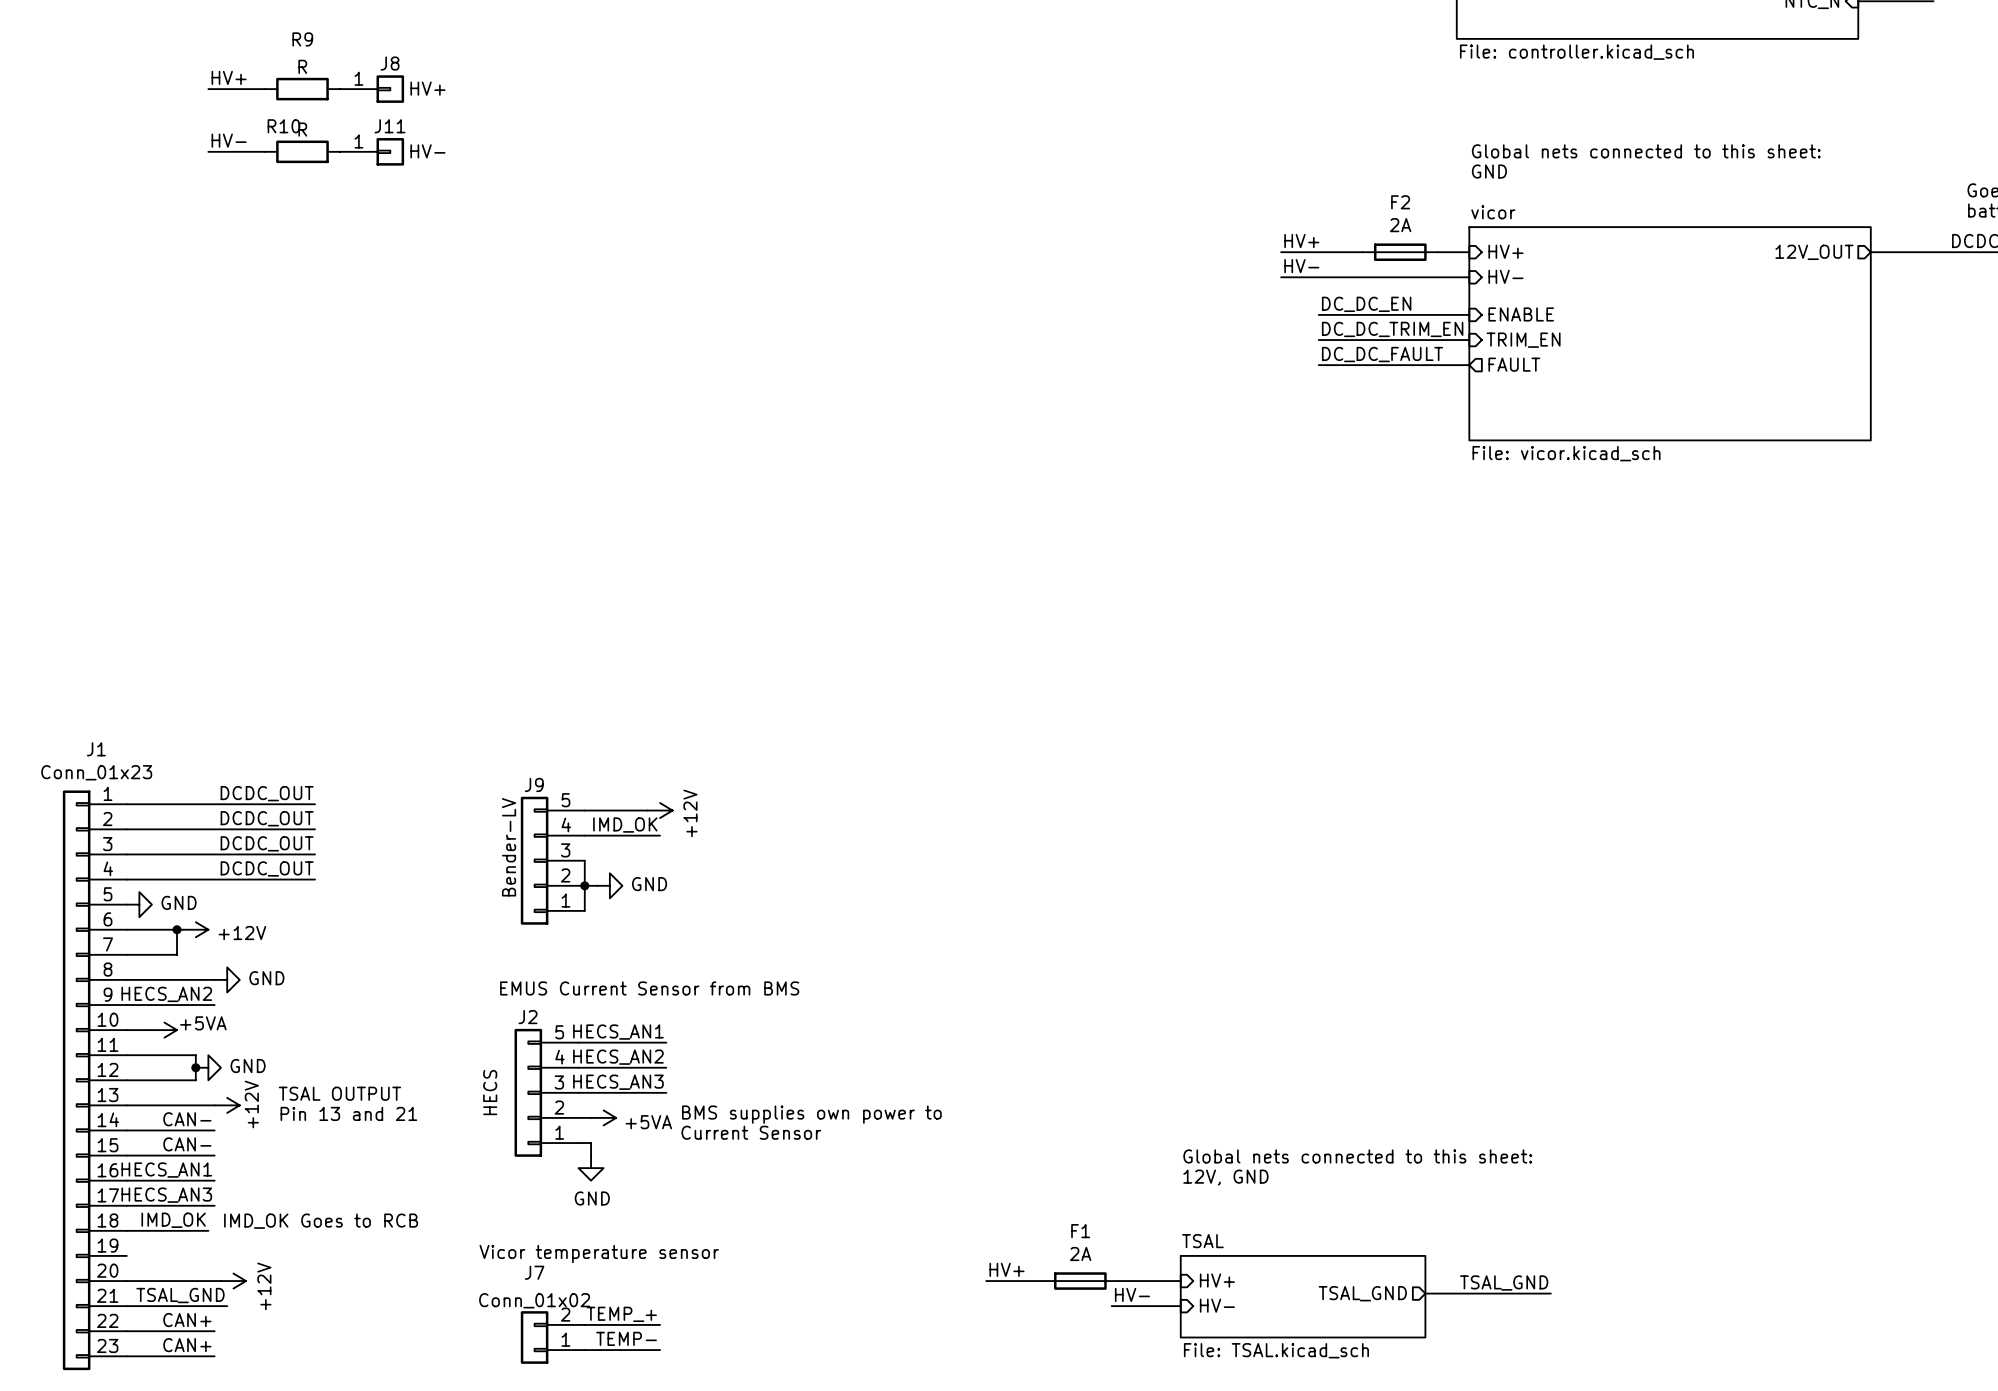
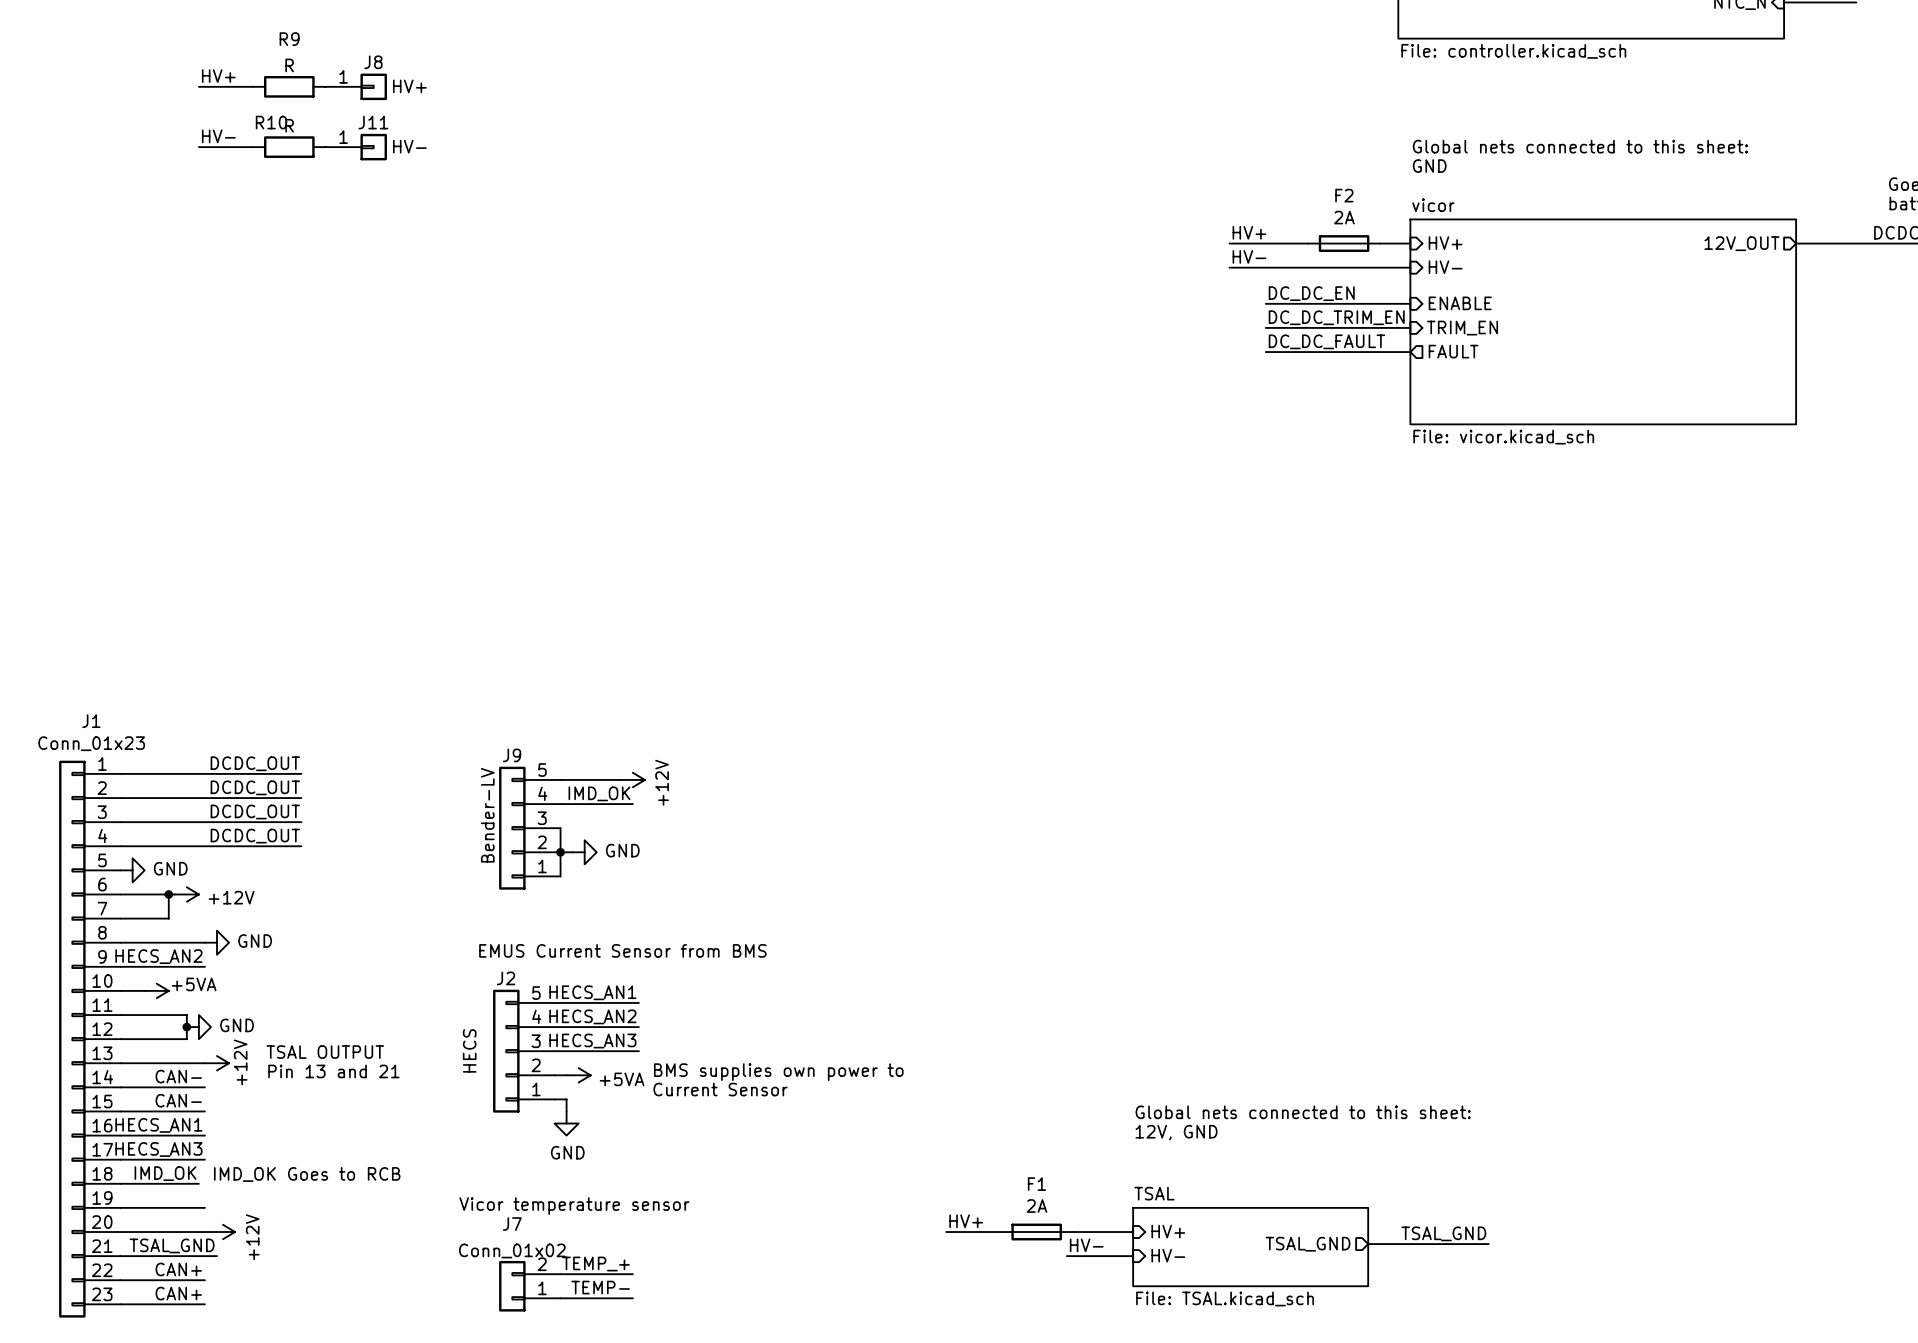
wire: none -> (120, 1207) (204, 1207)

